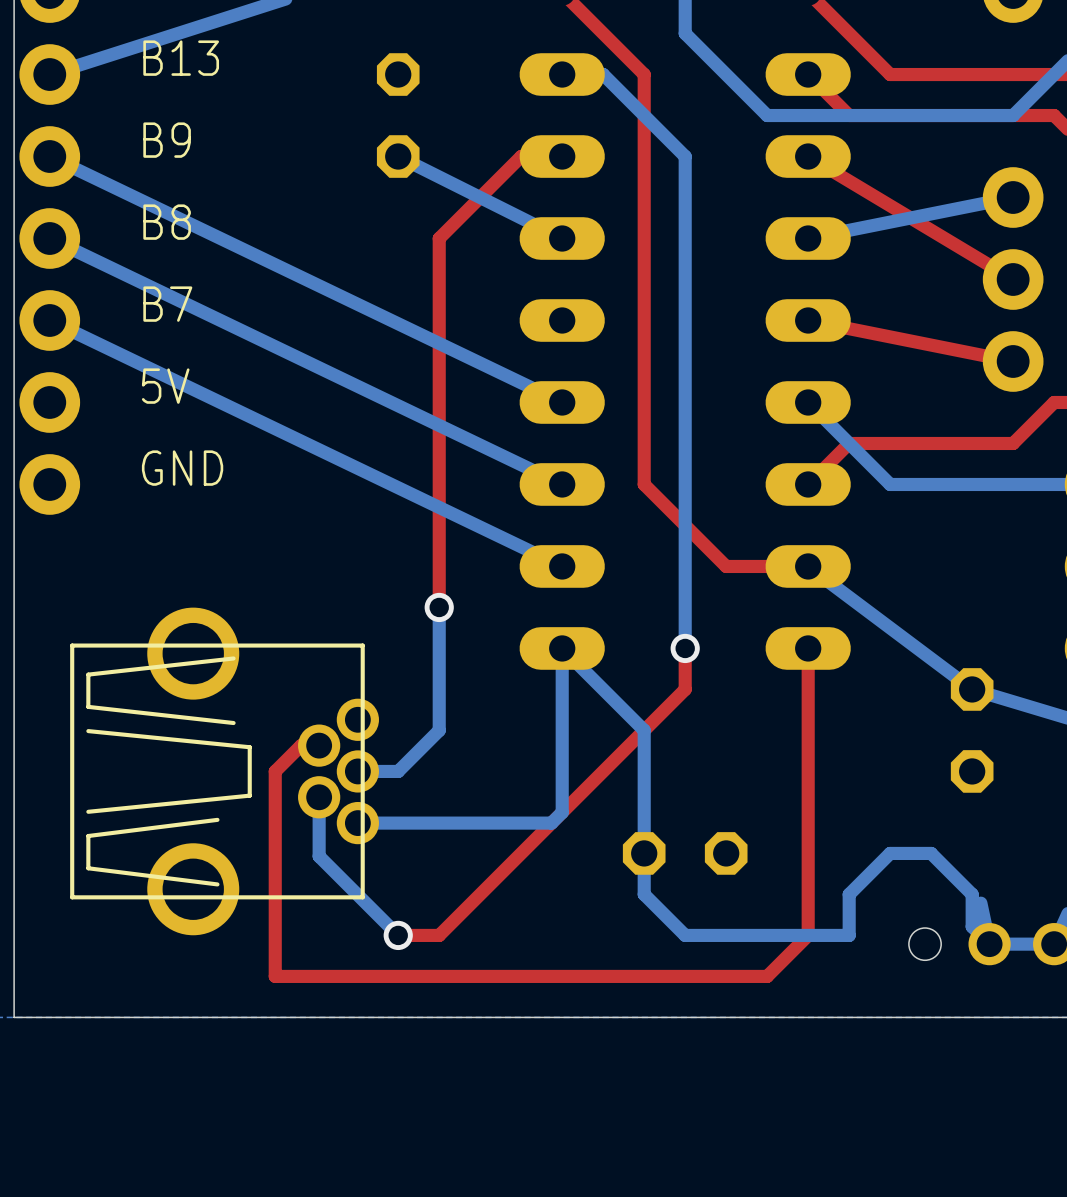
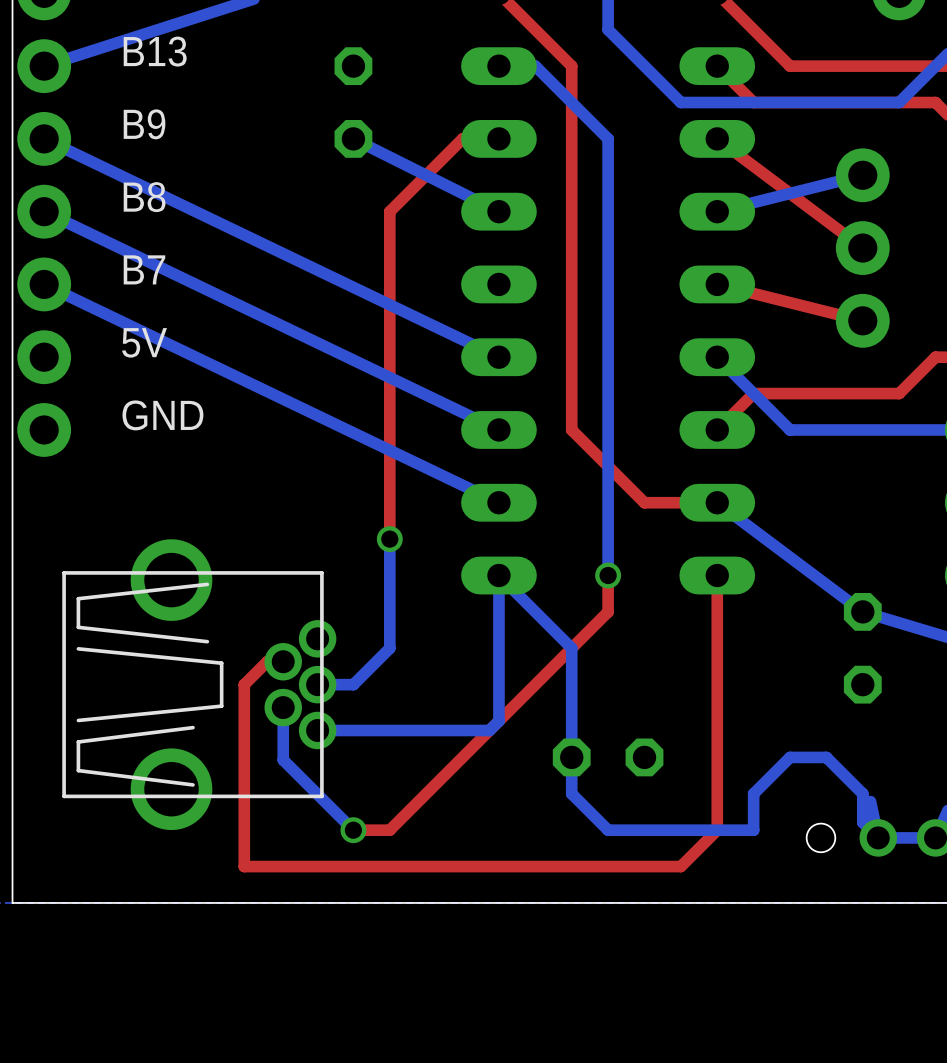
top track: (808, 156) (1013, 279) -> (717, 138) (862, 248)
bottom track: (1013, 197) (808, 238) -> (862, 175) (717, 211)
part position: (1013, 279) -> (862, 248)
top track: (808, 320) (1013, 361) -> (717, 284) (862, 320)

